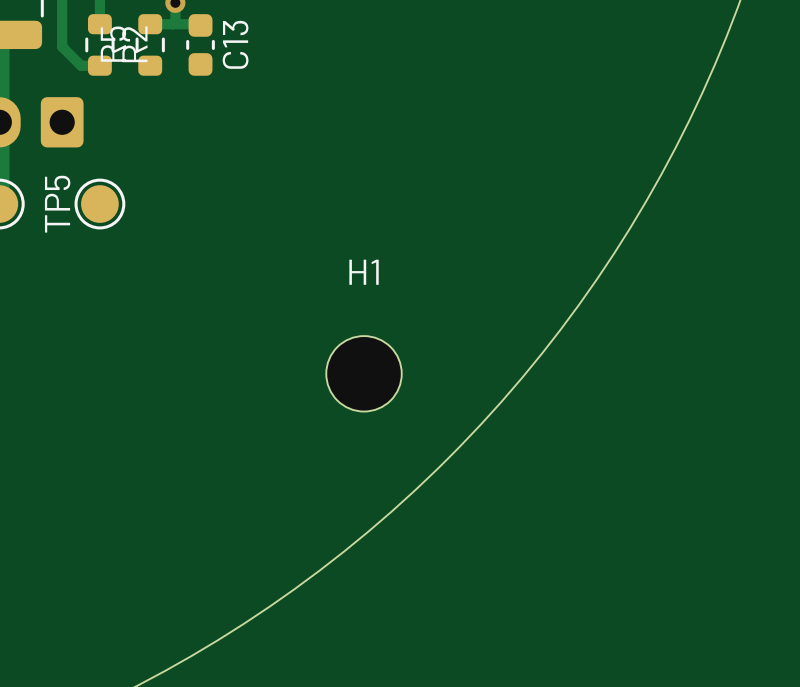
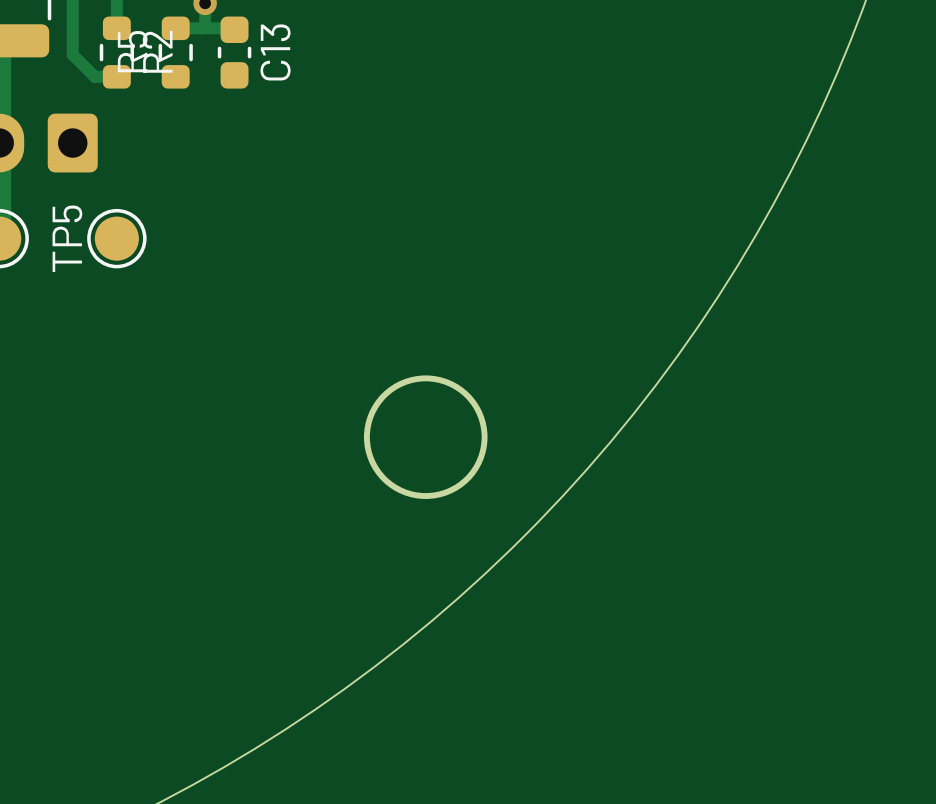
round board edge: none -> [363, 375, 488, 499]
H1: (364, 373) -> none

